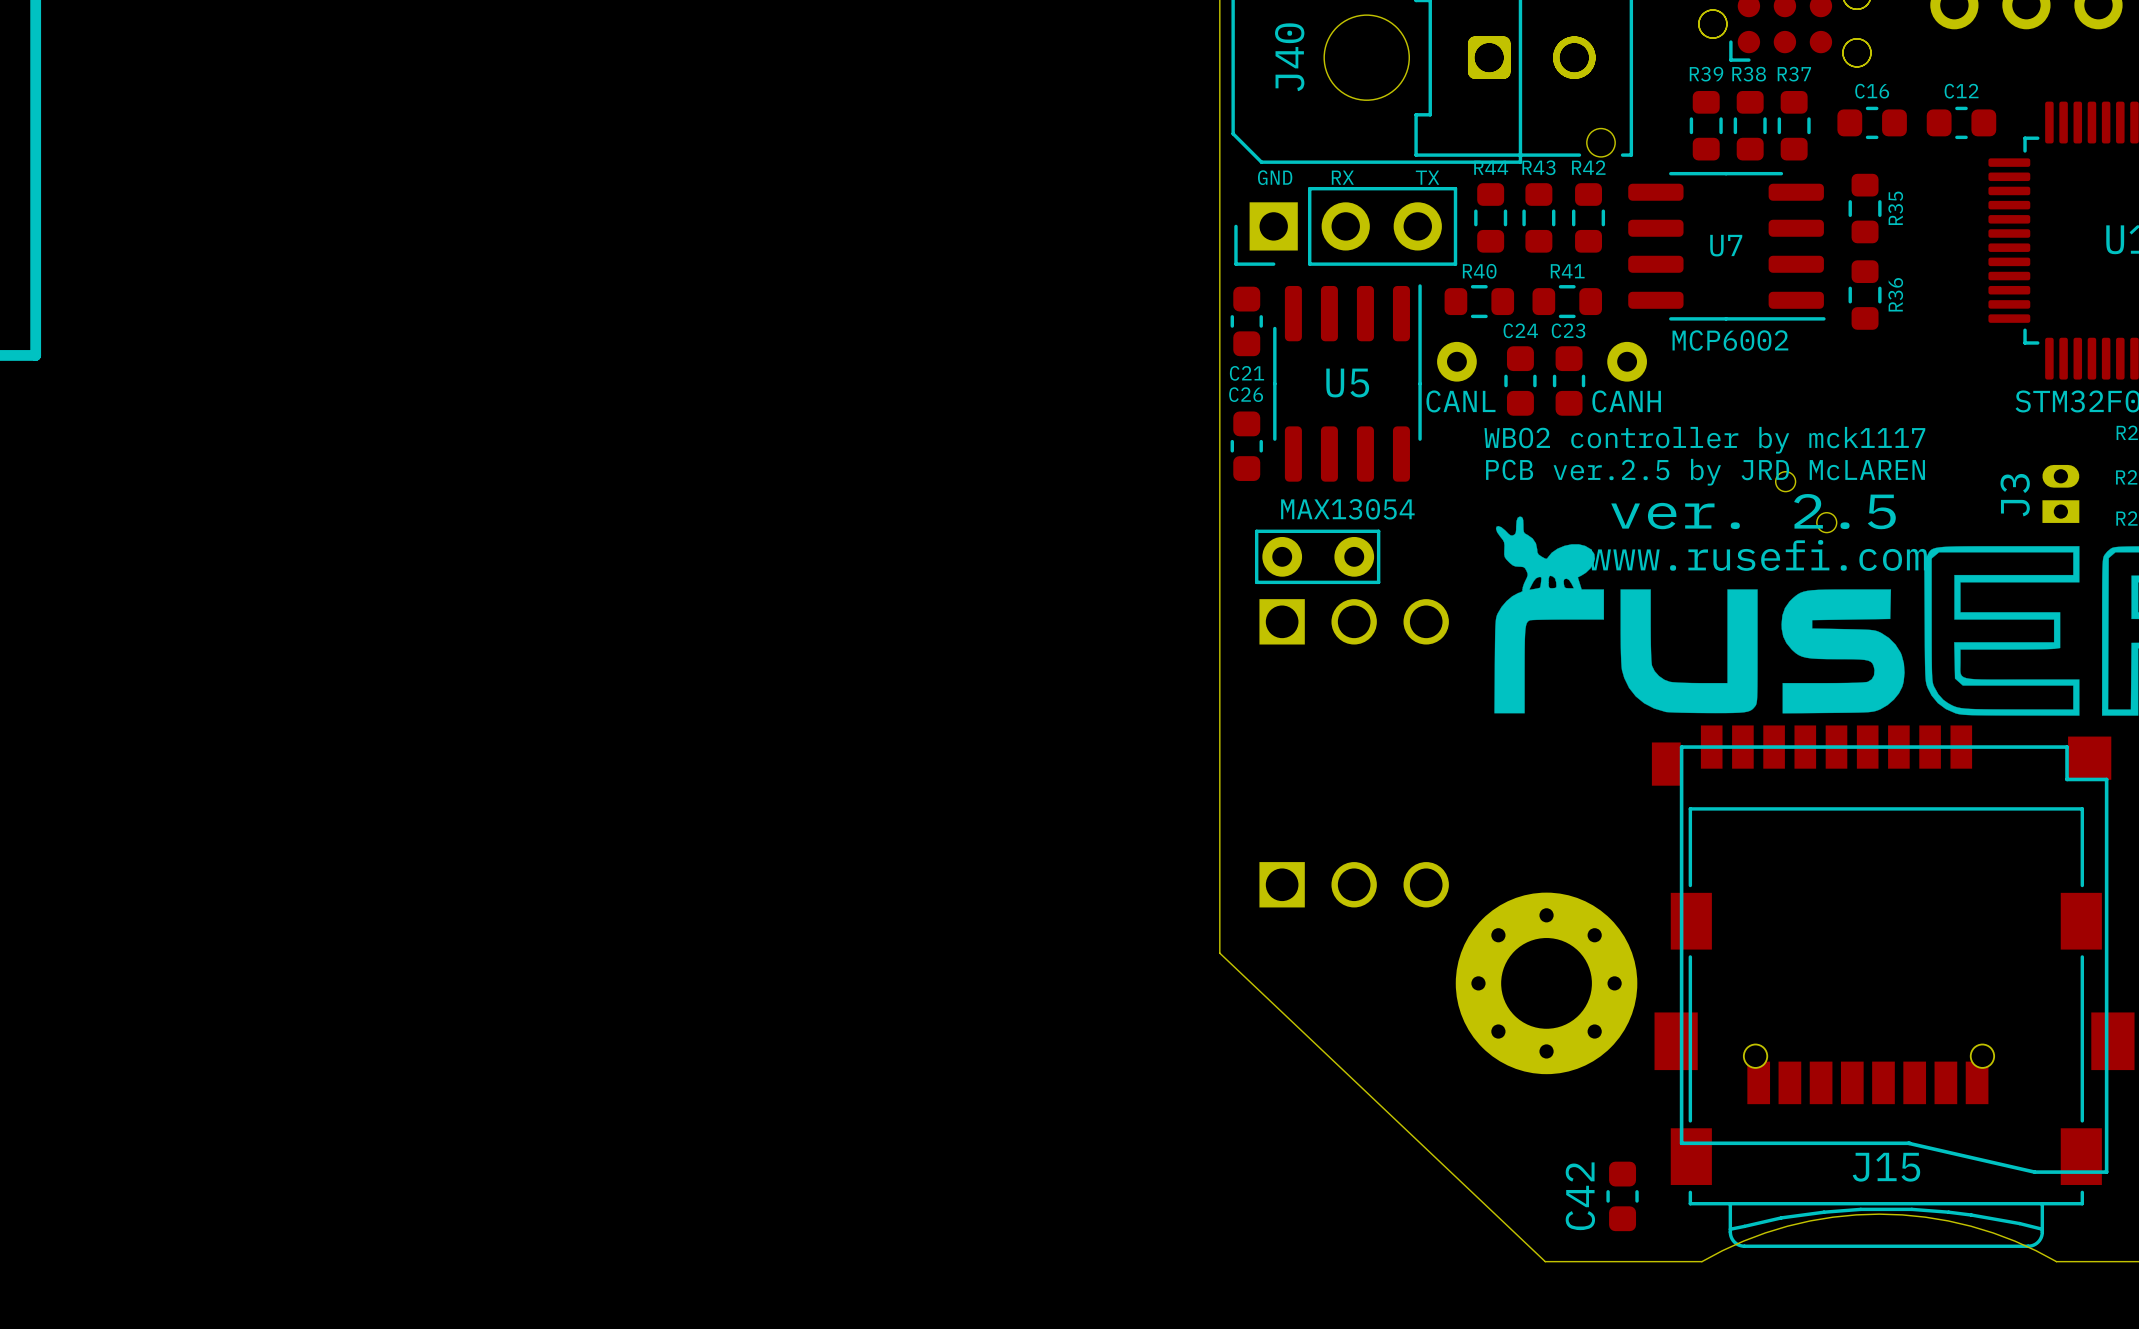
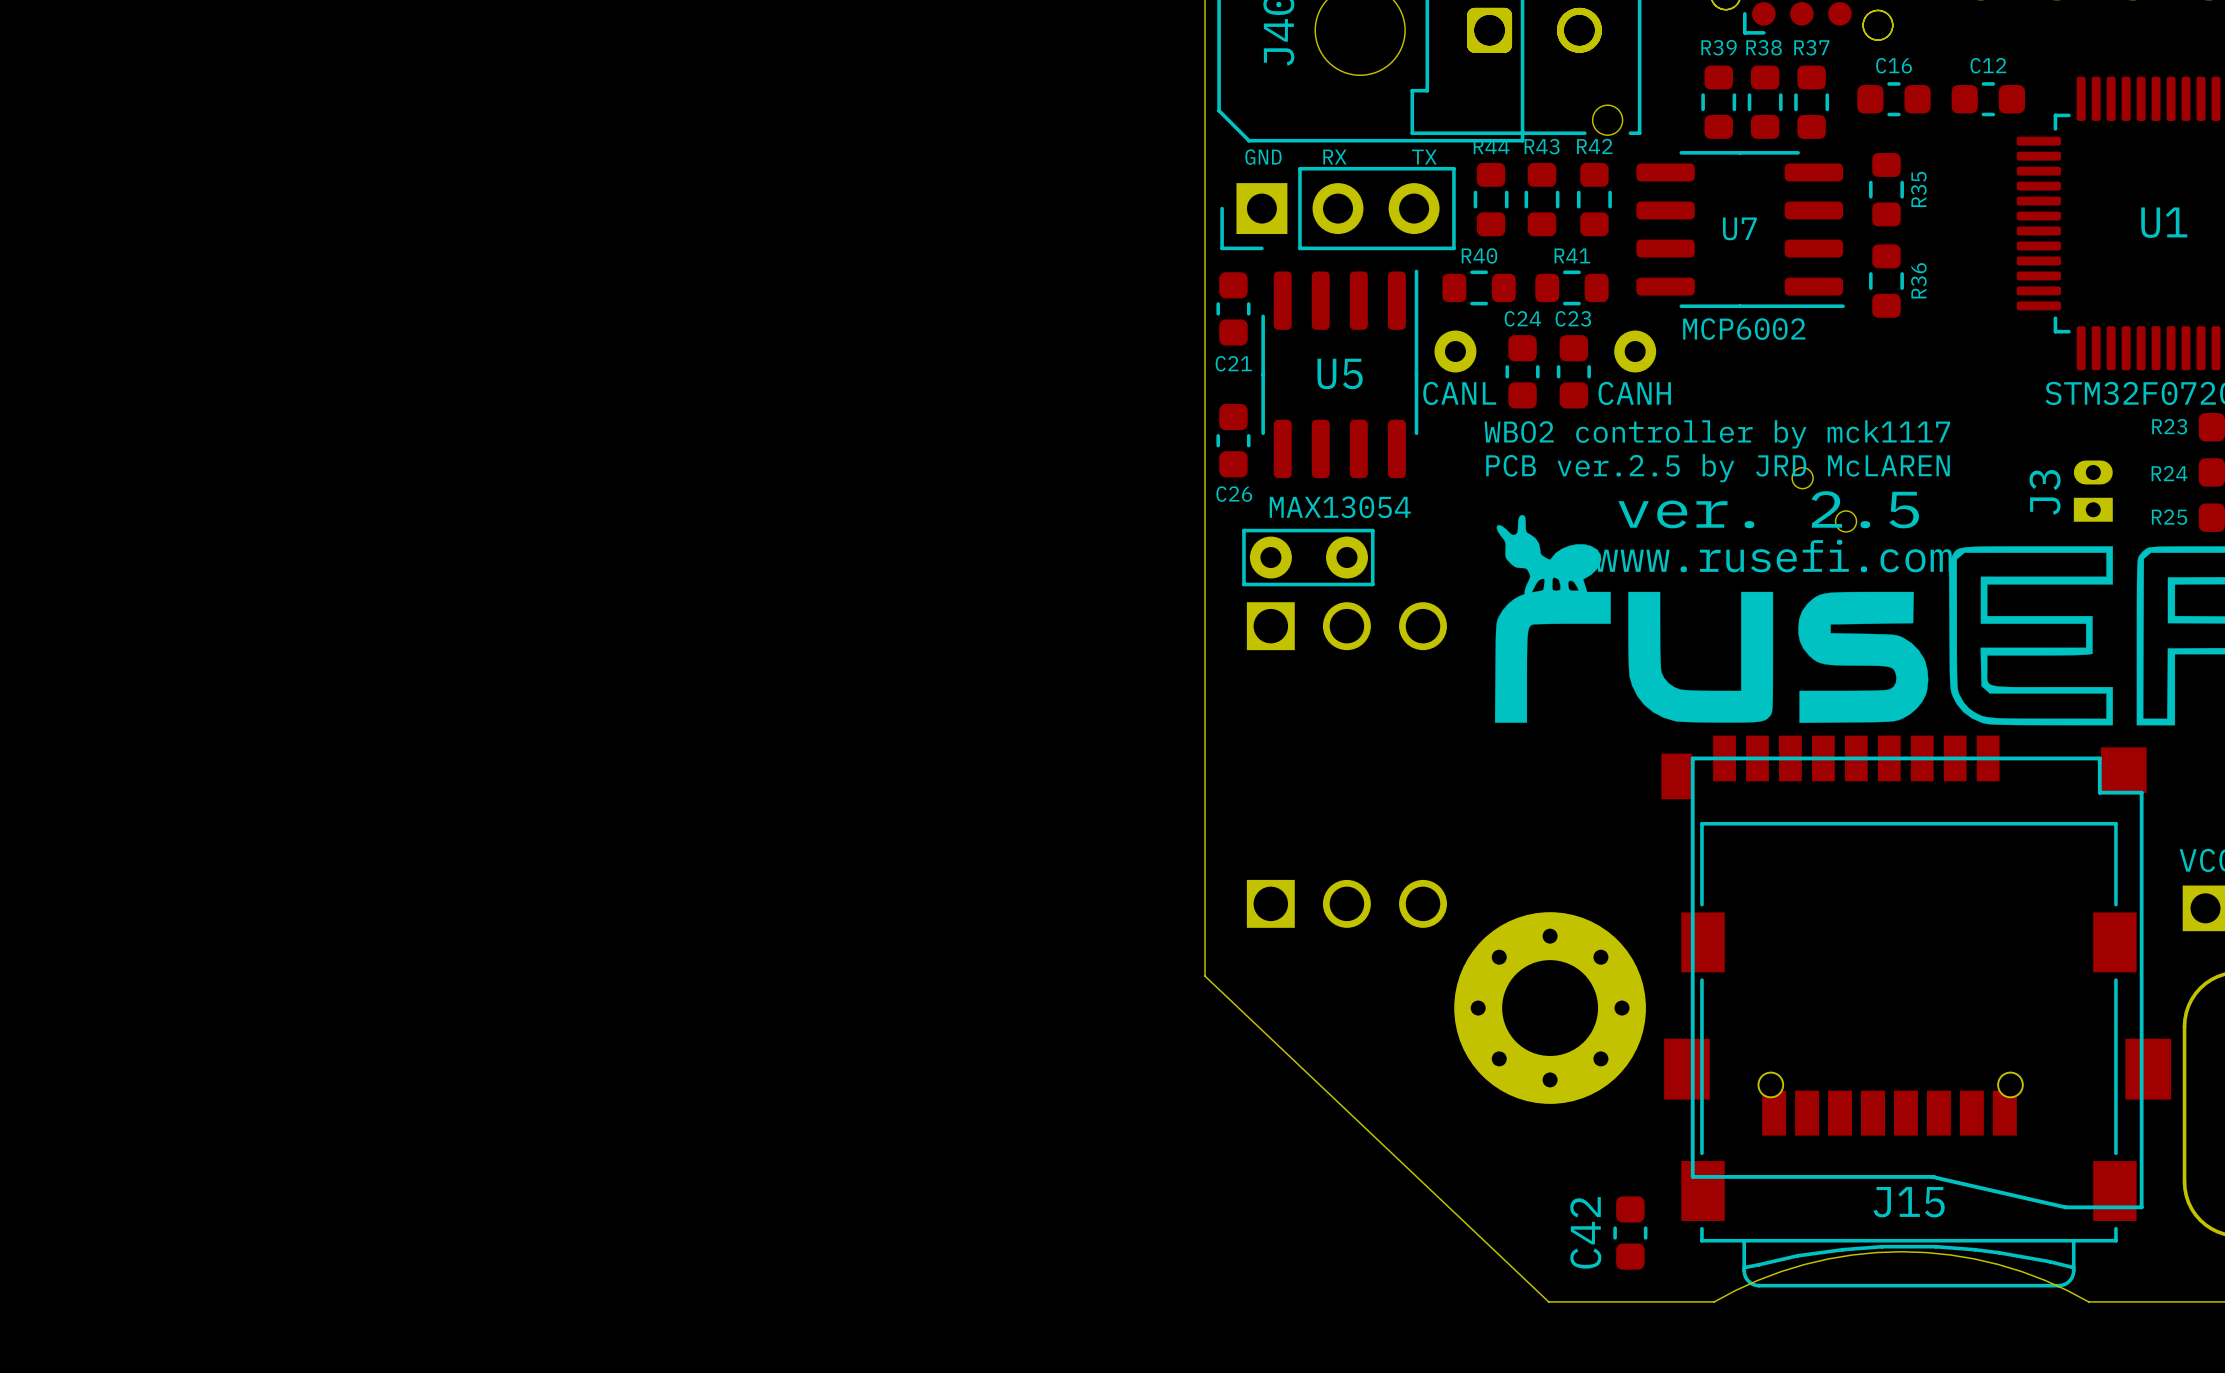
C26 name position: C26 (1246, 394) -> C26 (1234, 494)

